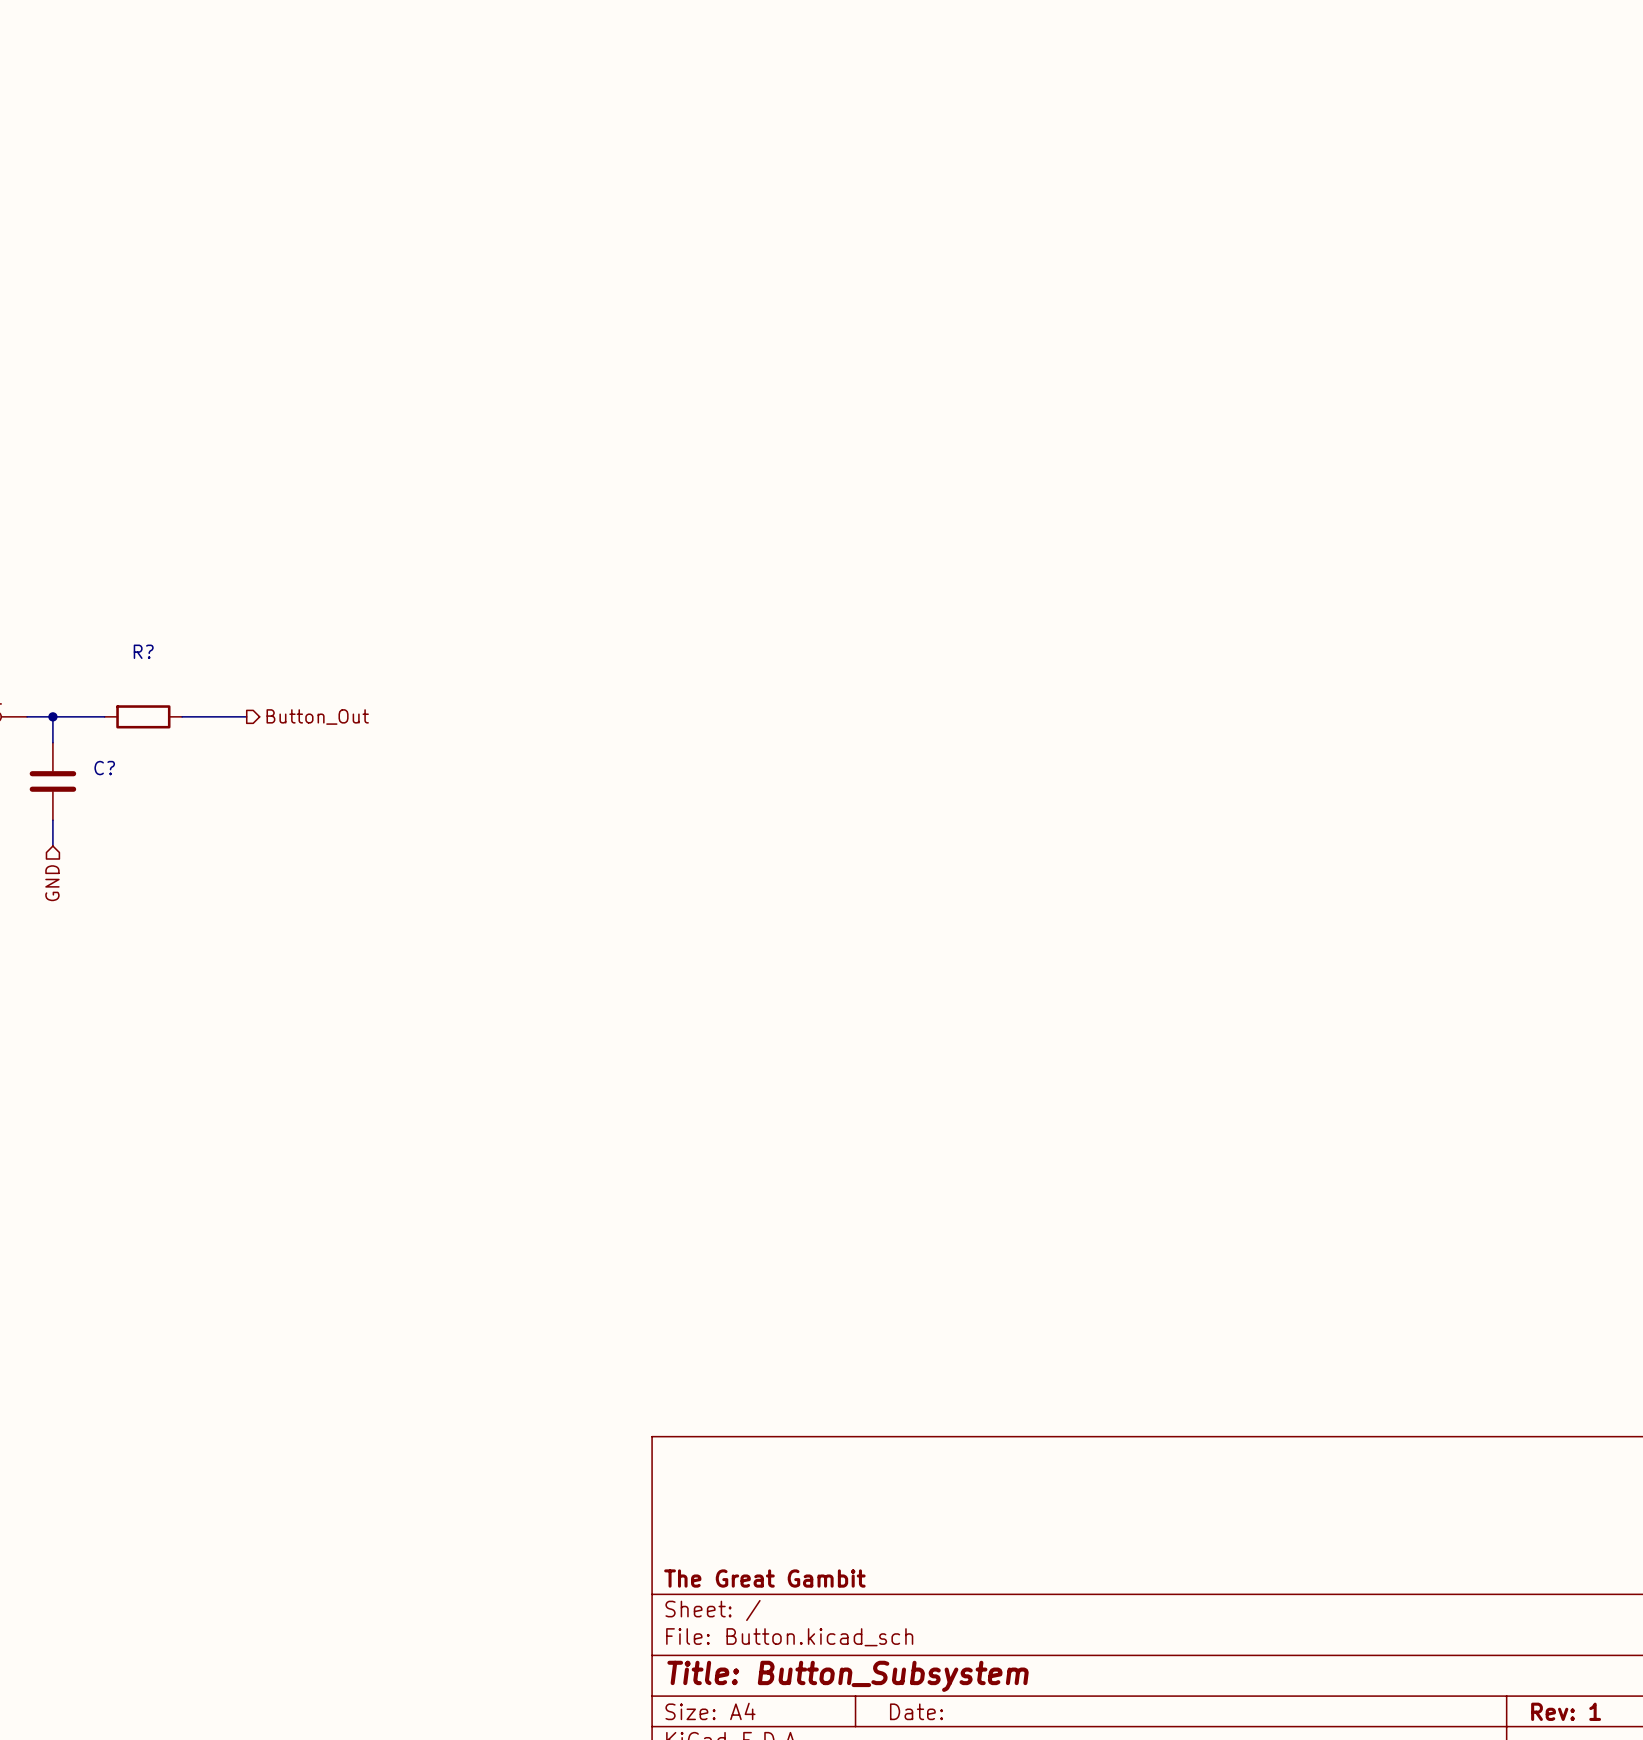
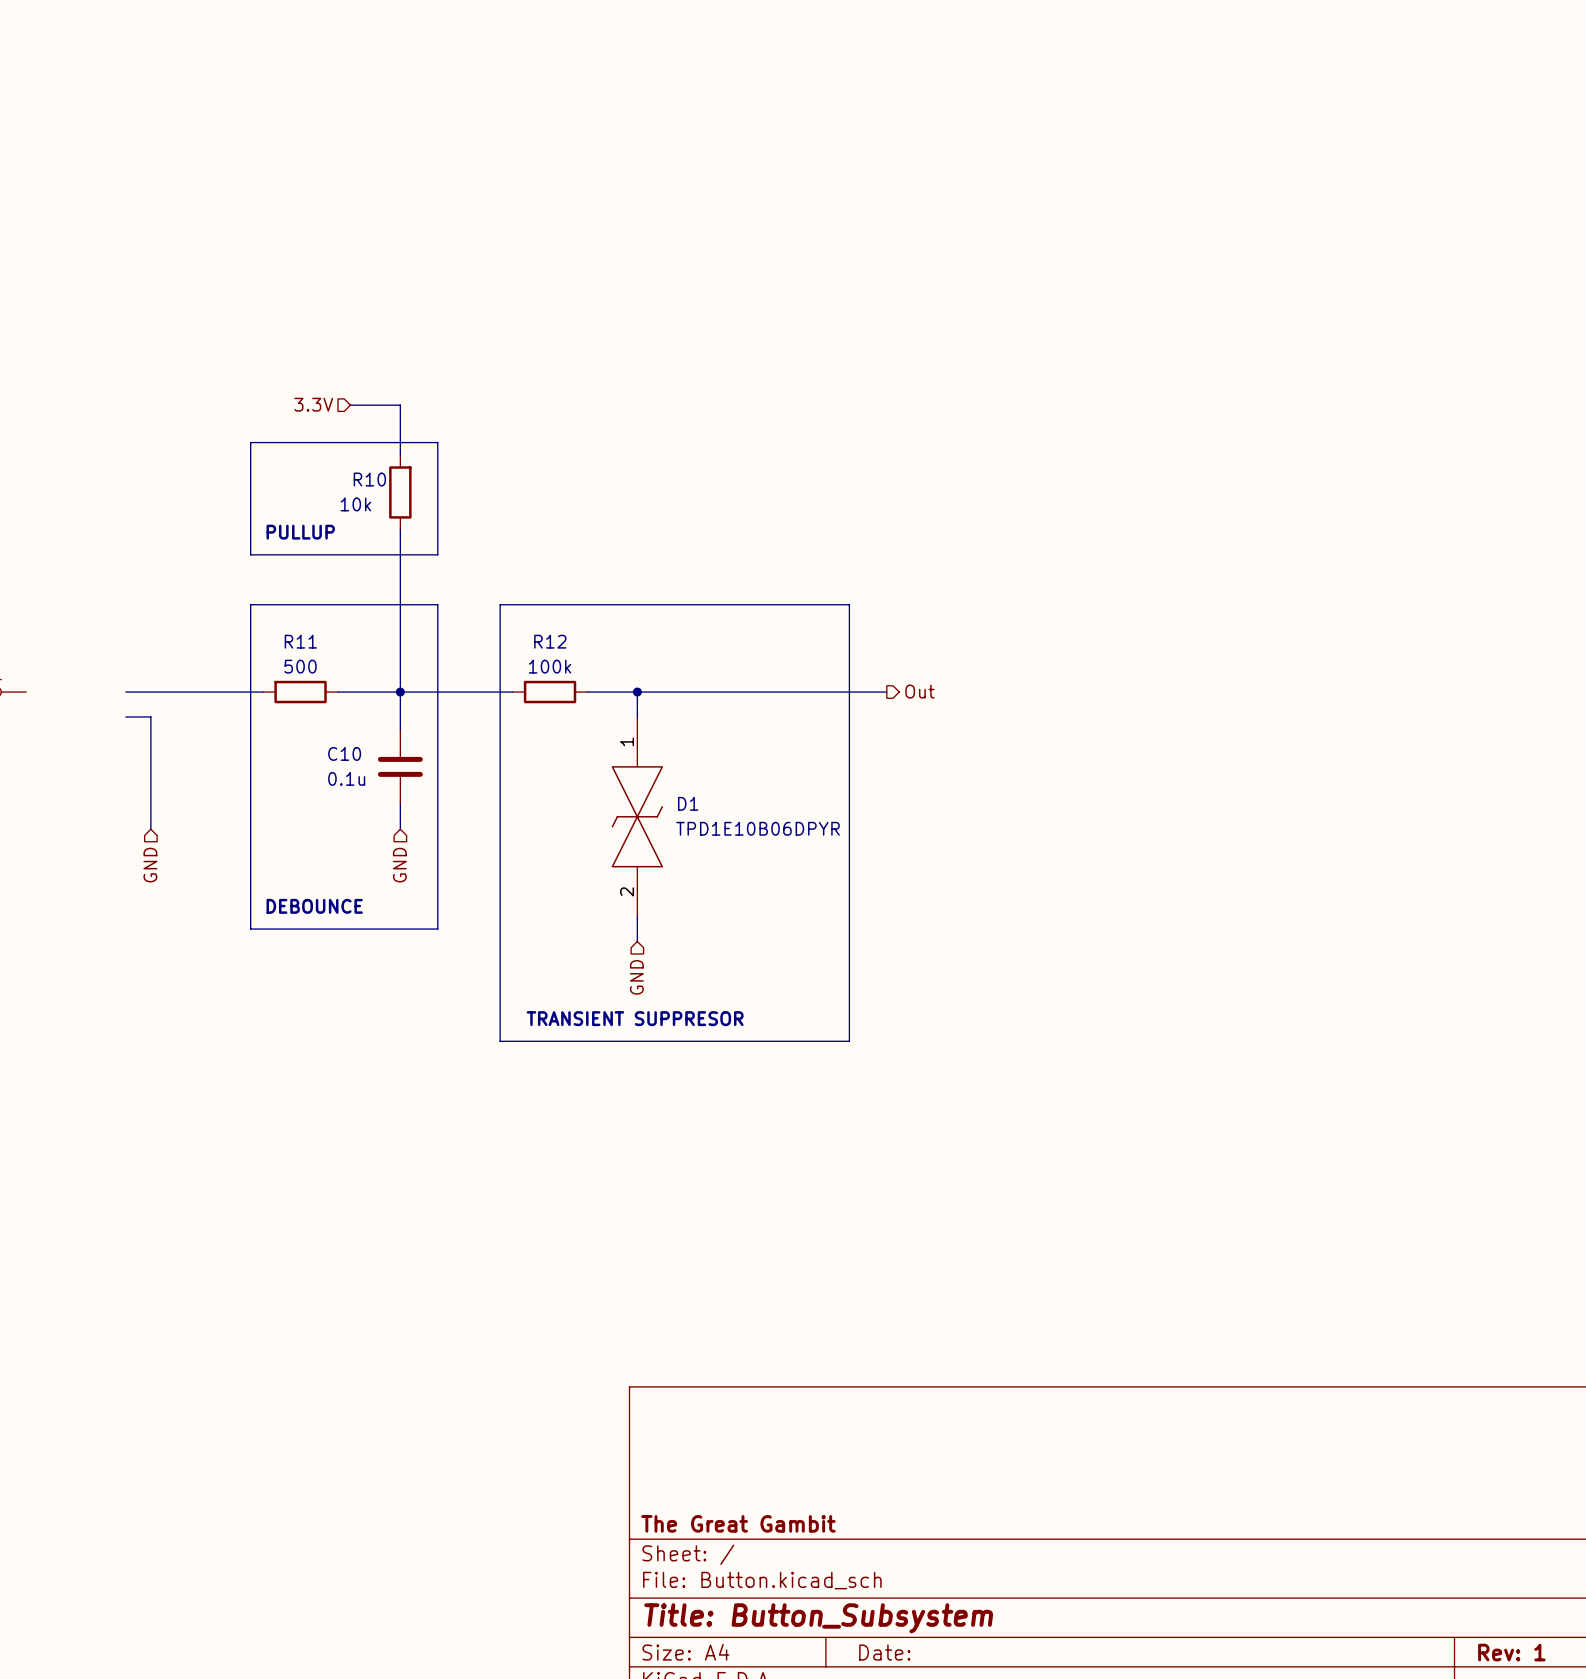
hierarchical label: none -> 3.3V (313, 404)
wire: none -> (350, 405) (400, 405) (400, 455)
line: none -> (250, 442) (250, 554) (437, 554) (437, 442) (250, 442)
R10: none -> 10k (400, 492)
wire: none -> (400, 529) (400, 729)
text: none -> PULLUP (300, 532)
line: none -> (250, 604) (437, 604) (437, 929) (250, 929) (250, 604)
line: none -> (500, 604) (849, 604) (849, 1041) (500, 1041) (500, 604)
wire: (27, 716) (104, 716) -> none
wire: (52, 716) (52, 742) -> none
junction: (52, 716) -> none
wire: none -> (125, 692) (175, 692)
R?: (143, 716) -> none
wire: none -> (238, 692) (263, 692)
R11: none -> 500 (300, 692)
hierarchical label: Button_Out (317, 716) -> none
wire: none -> (337, 692) (512, 692)
junction: none -> (400, 692)
R12: none -> 100k (550, 692)
wire: none -> (587, 692) (886, 692)
wire: none -> (637, 692) (637, 716)
junction: none -> (637, 692)
hierarchical label: none -> Out (919, 691)
wire: none -> (125, 716) (150, 716) (150, 829)
C?: (52, 781) -> none
C10: none -> 0.1u (400, 766)
wire: (52, 820) (52, 846) -> none
wire: none -> (400, 804) (400, 829)
D1: none -> TPD1E10B06DPYR (637, 816)
hierarchical label position: GND (52, 883) -> GND (150, 865)
hierarchical label: none -> GND (399, 865)
text: none -> DEBOUNCE (314, 906)
wire: none -> (637, 916) (637, 941)
hierarchical label: none -> GND (636, 977)
text: none -> TRANSIENT SUPPRESOR (635, 1018)

